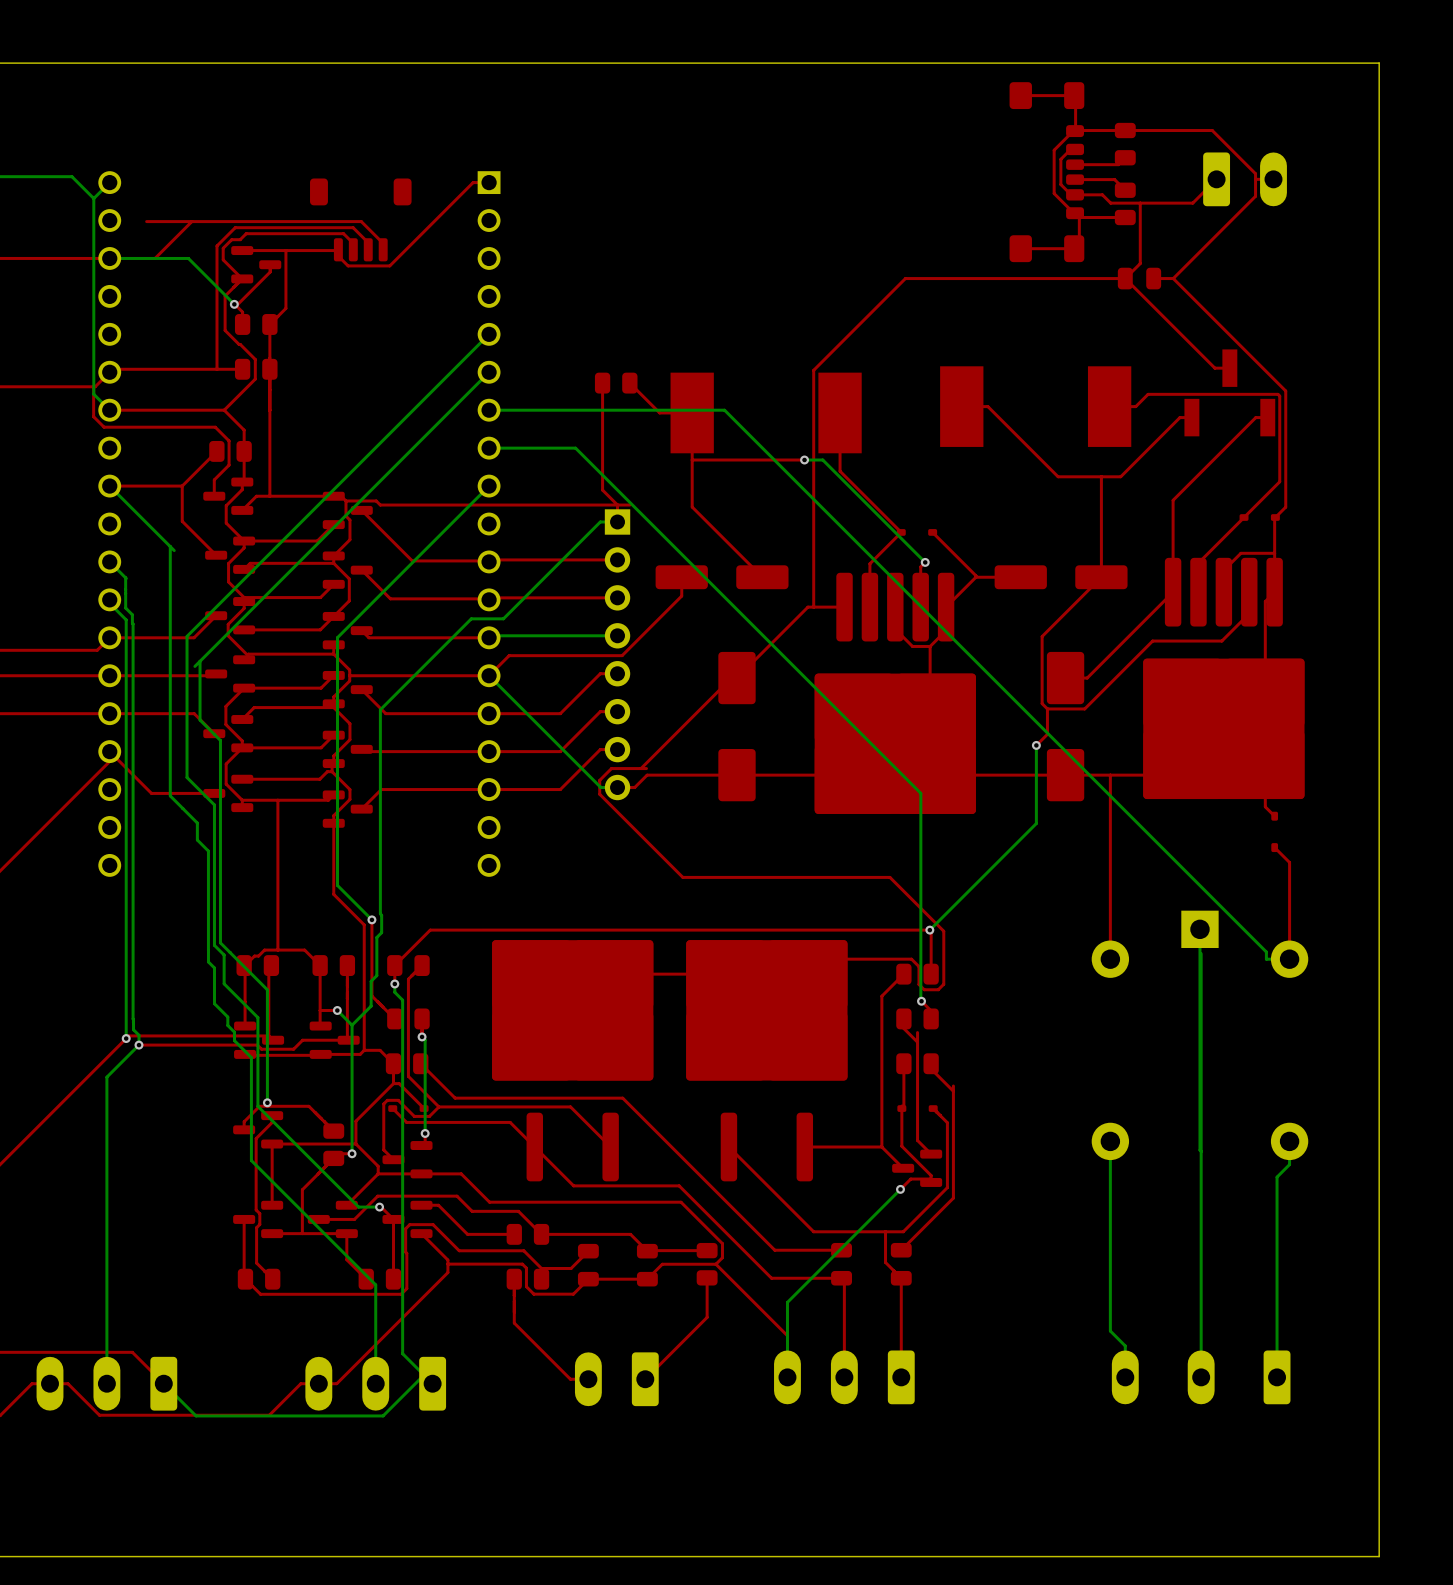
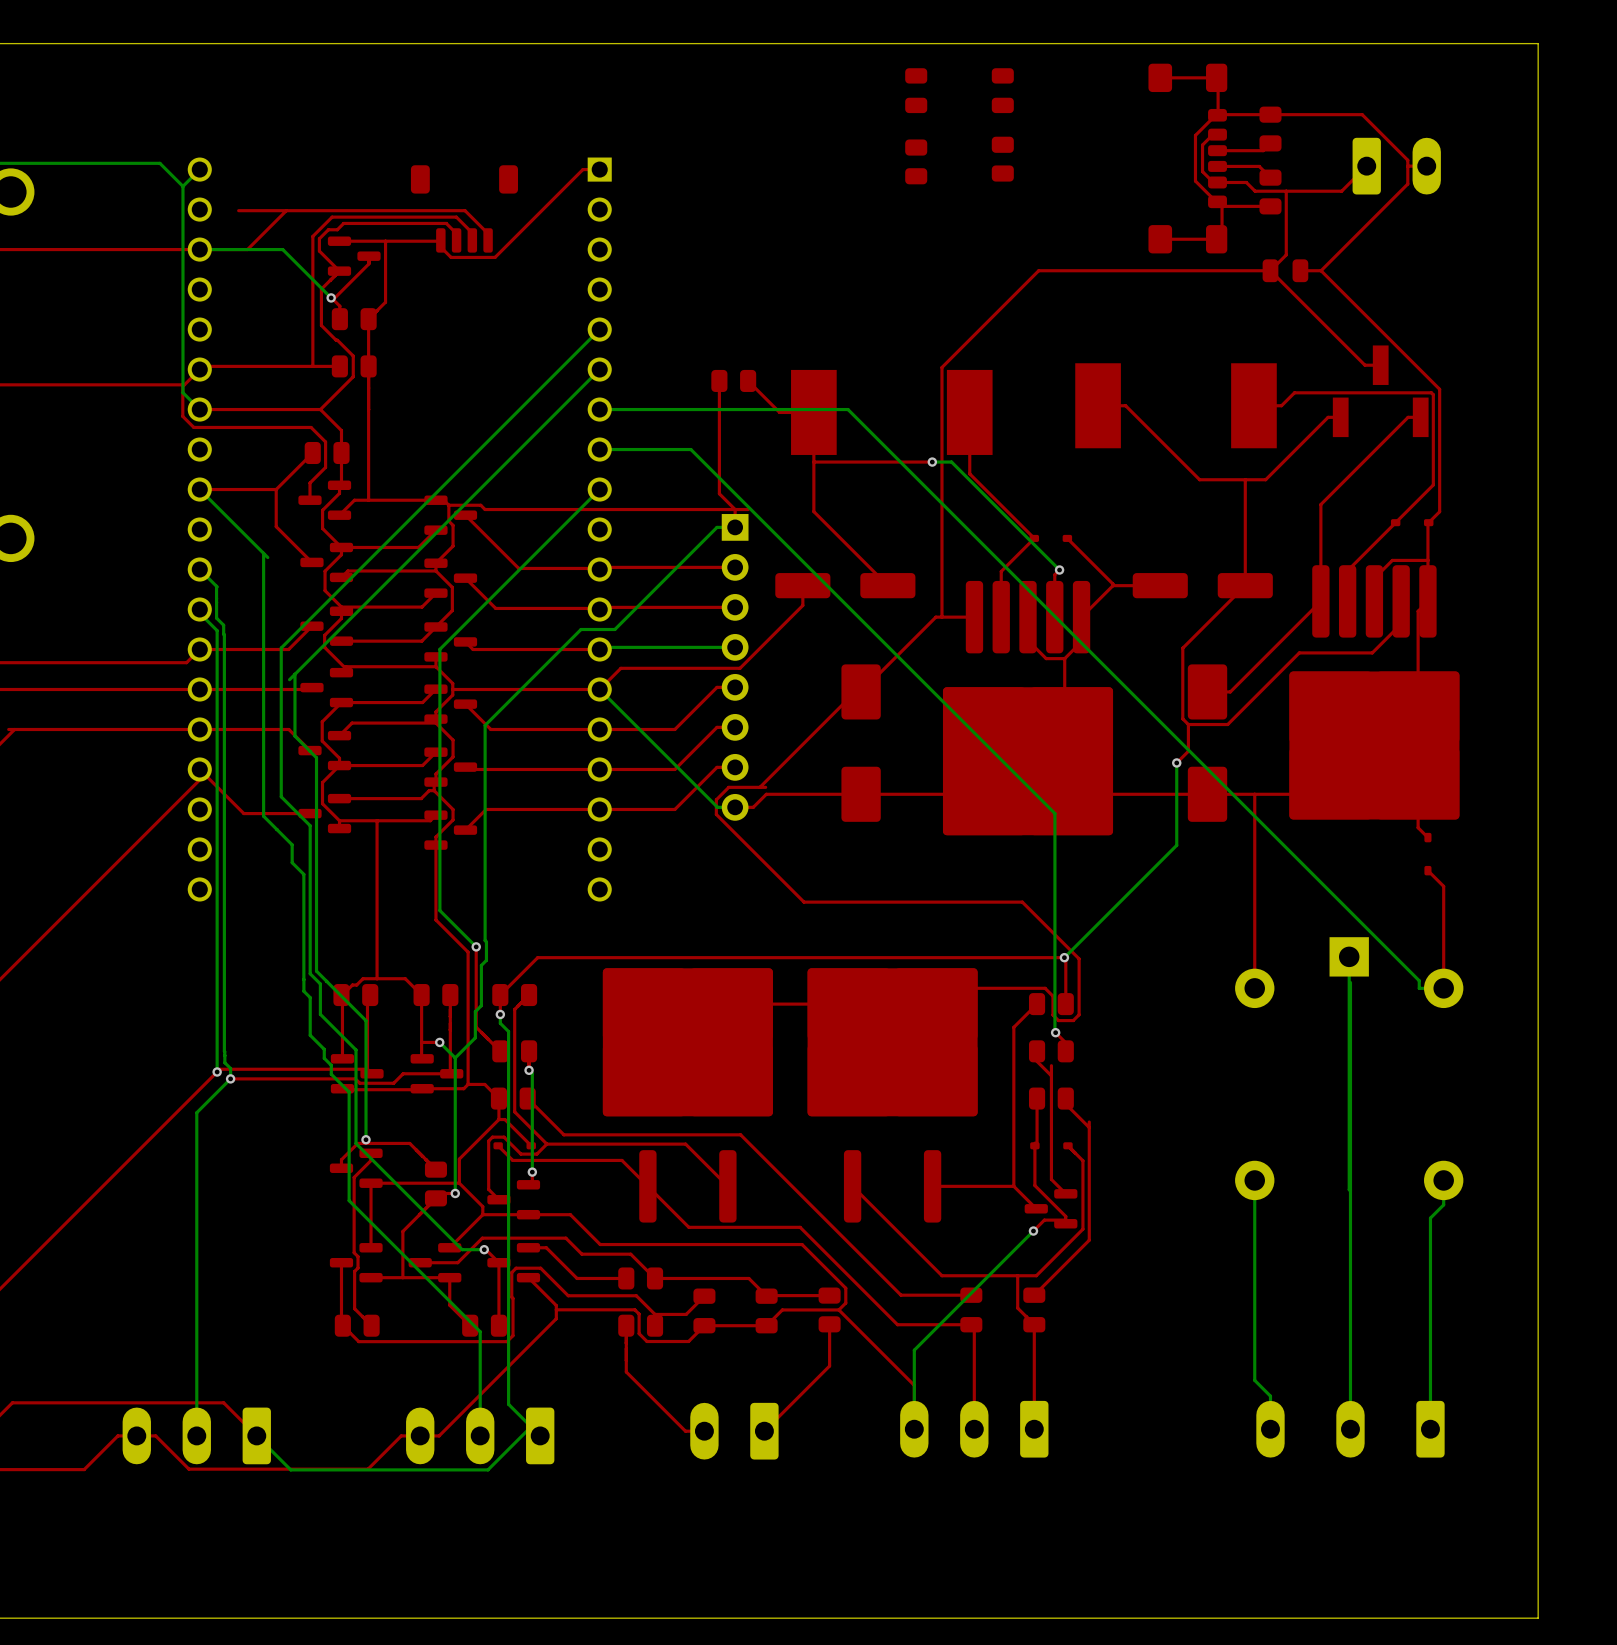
part: none -> (916, 90)
part: none -> (1002, 90)
part: none -> (1002, 159)
part: none -> (916, 161)

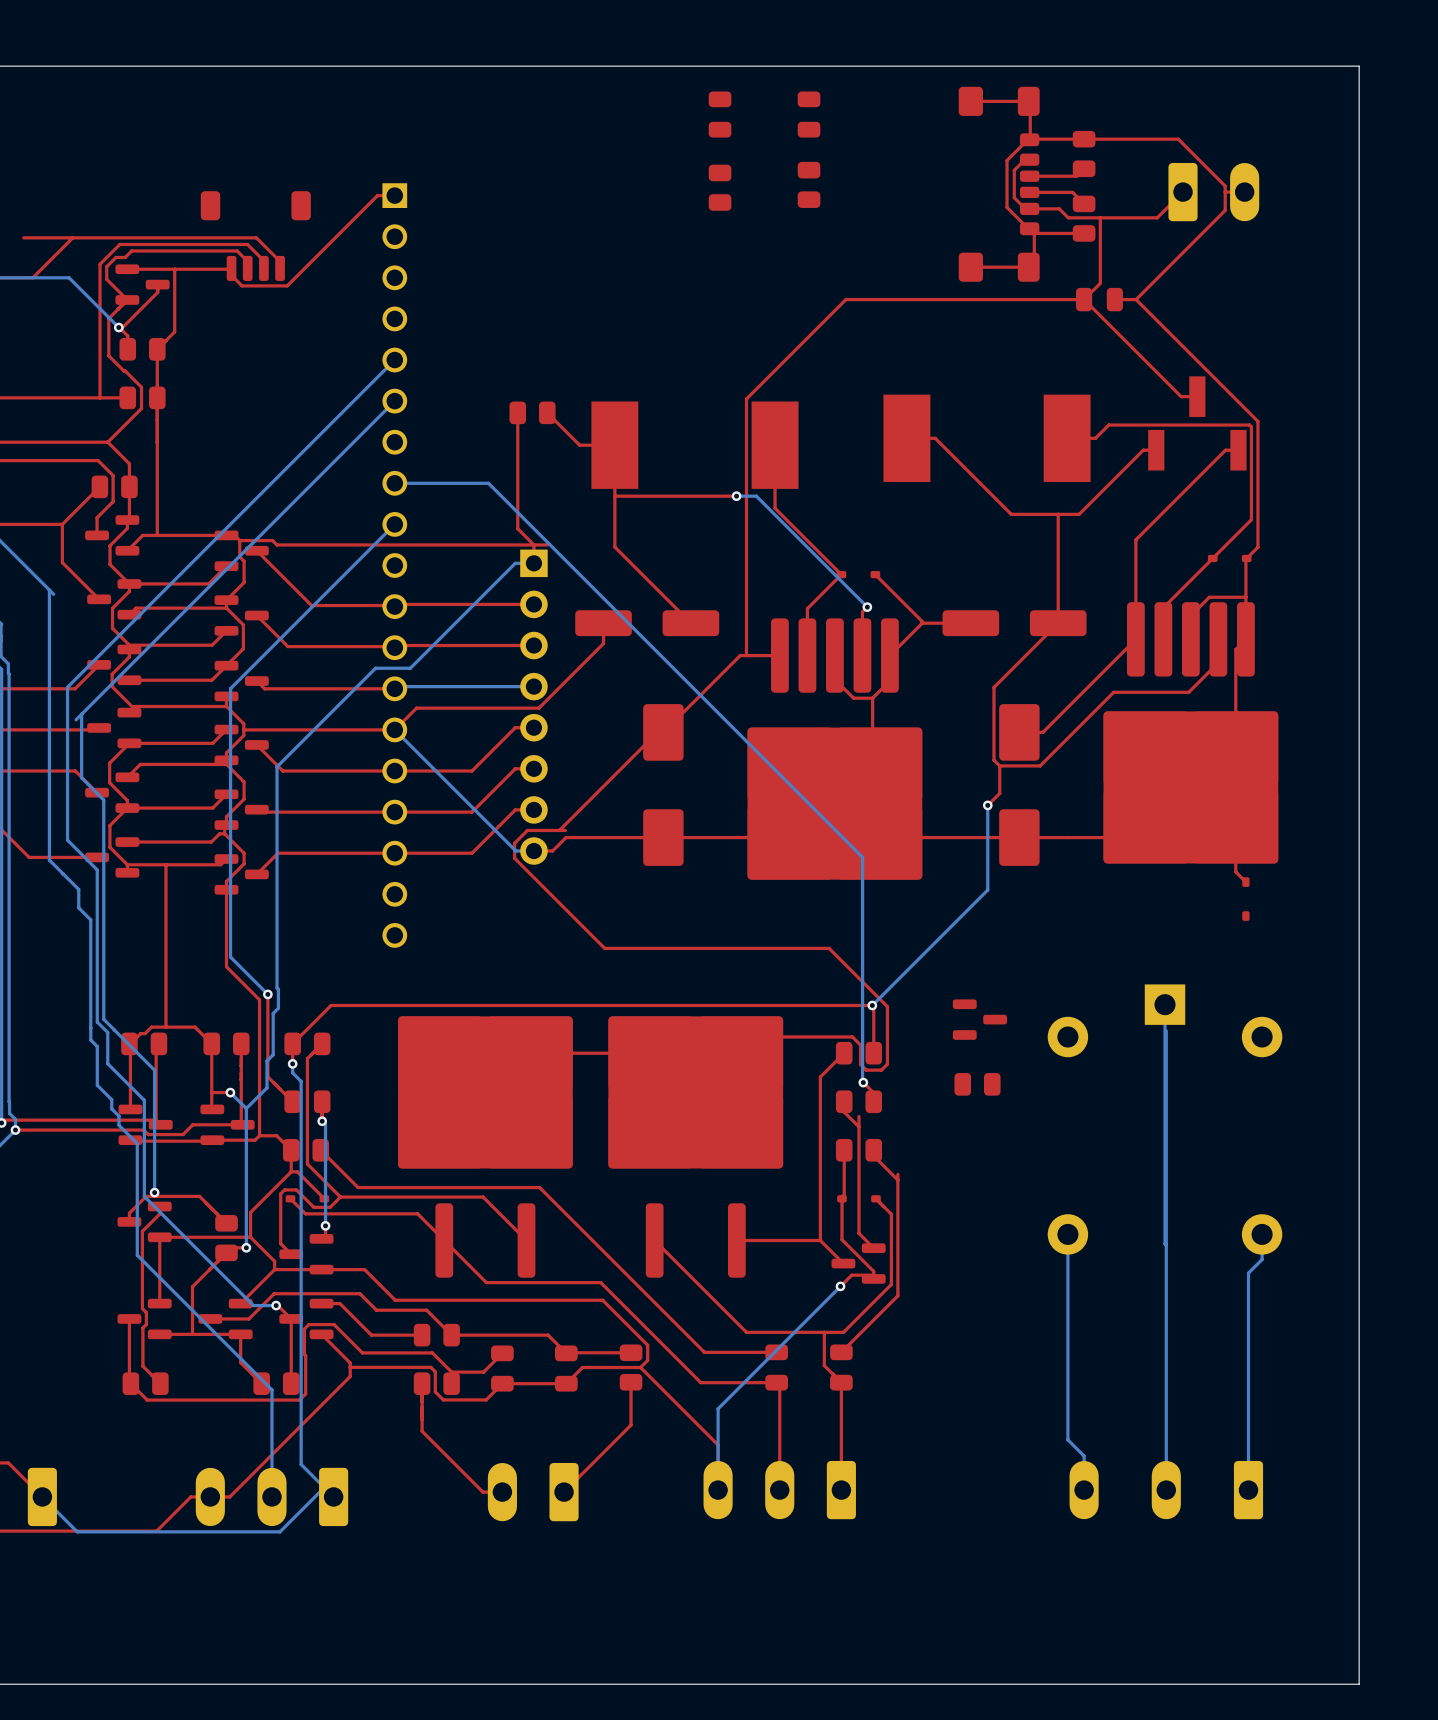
bottom track: (599, 409) (848, 409) (1419, 980) (1419, 988) (1443, 988) -> none
top track: (1254, 794) (1254, 988) -> none
top track: (1427, 870) (1443, 886) (1443, 988) -> none
part: none -> (979, 1019)
part: none -> (977, 1084)

